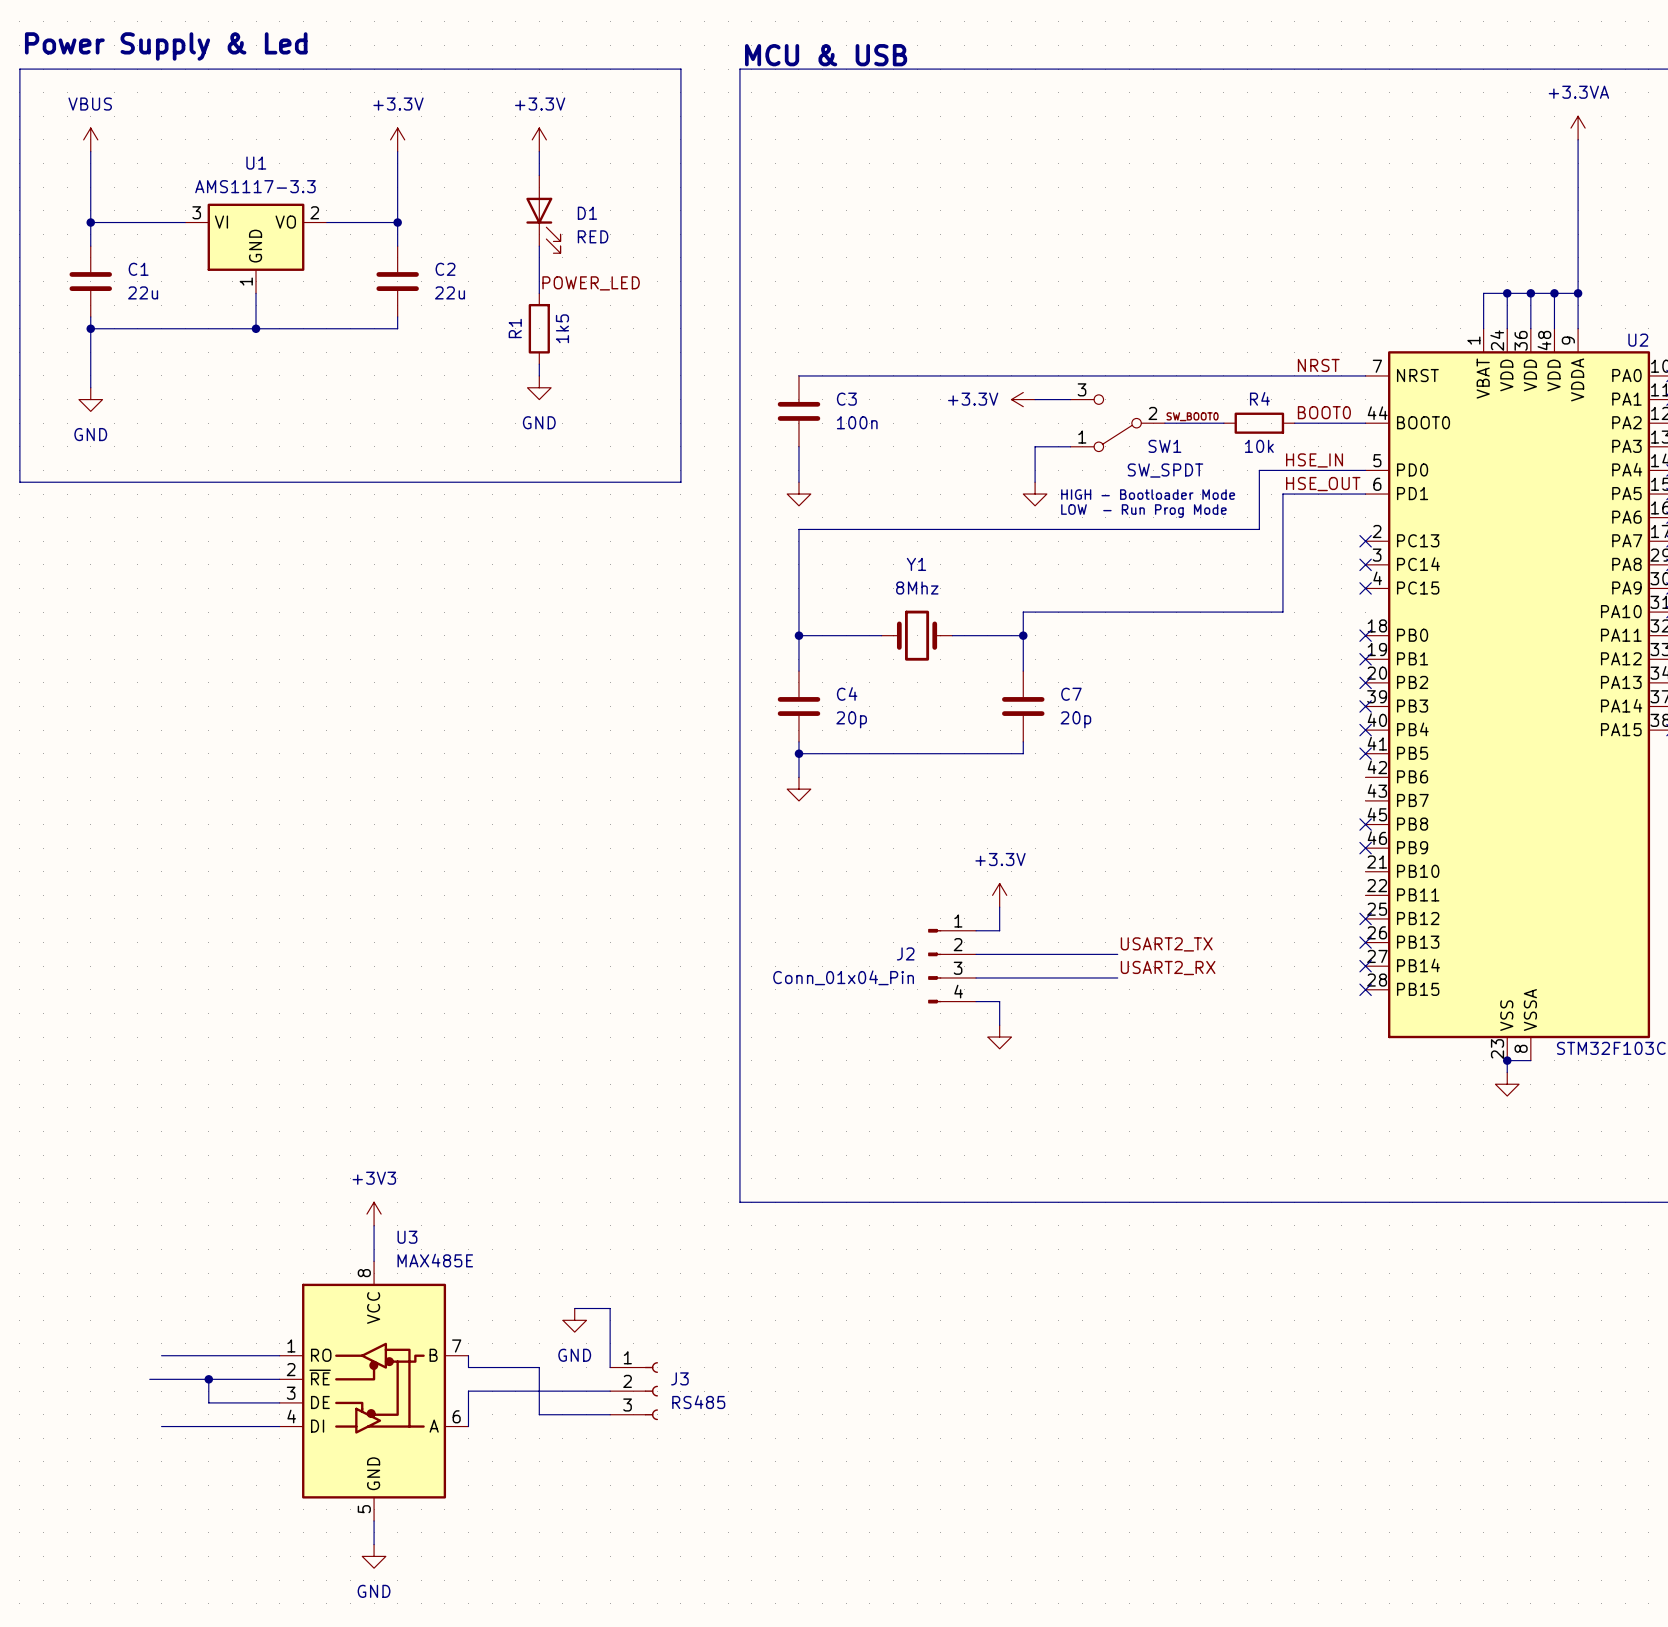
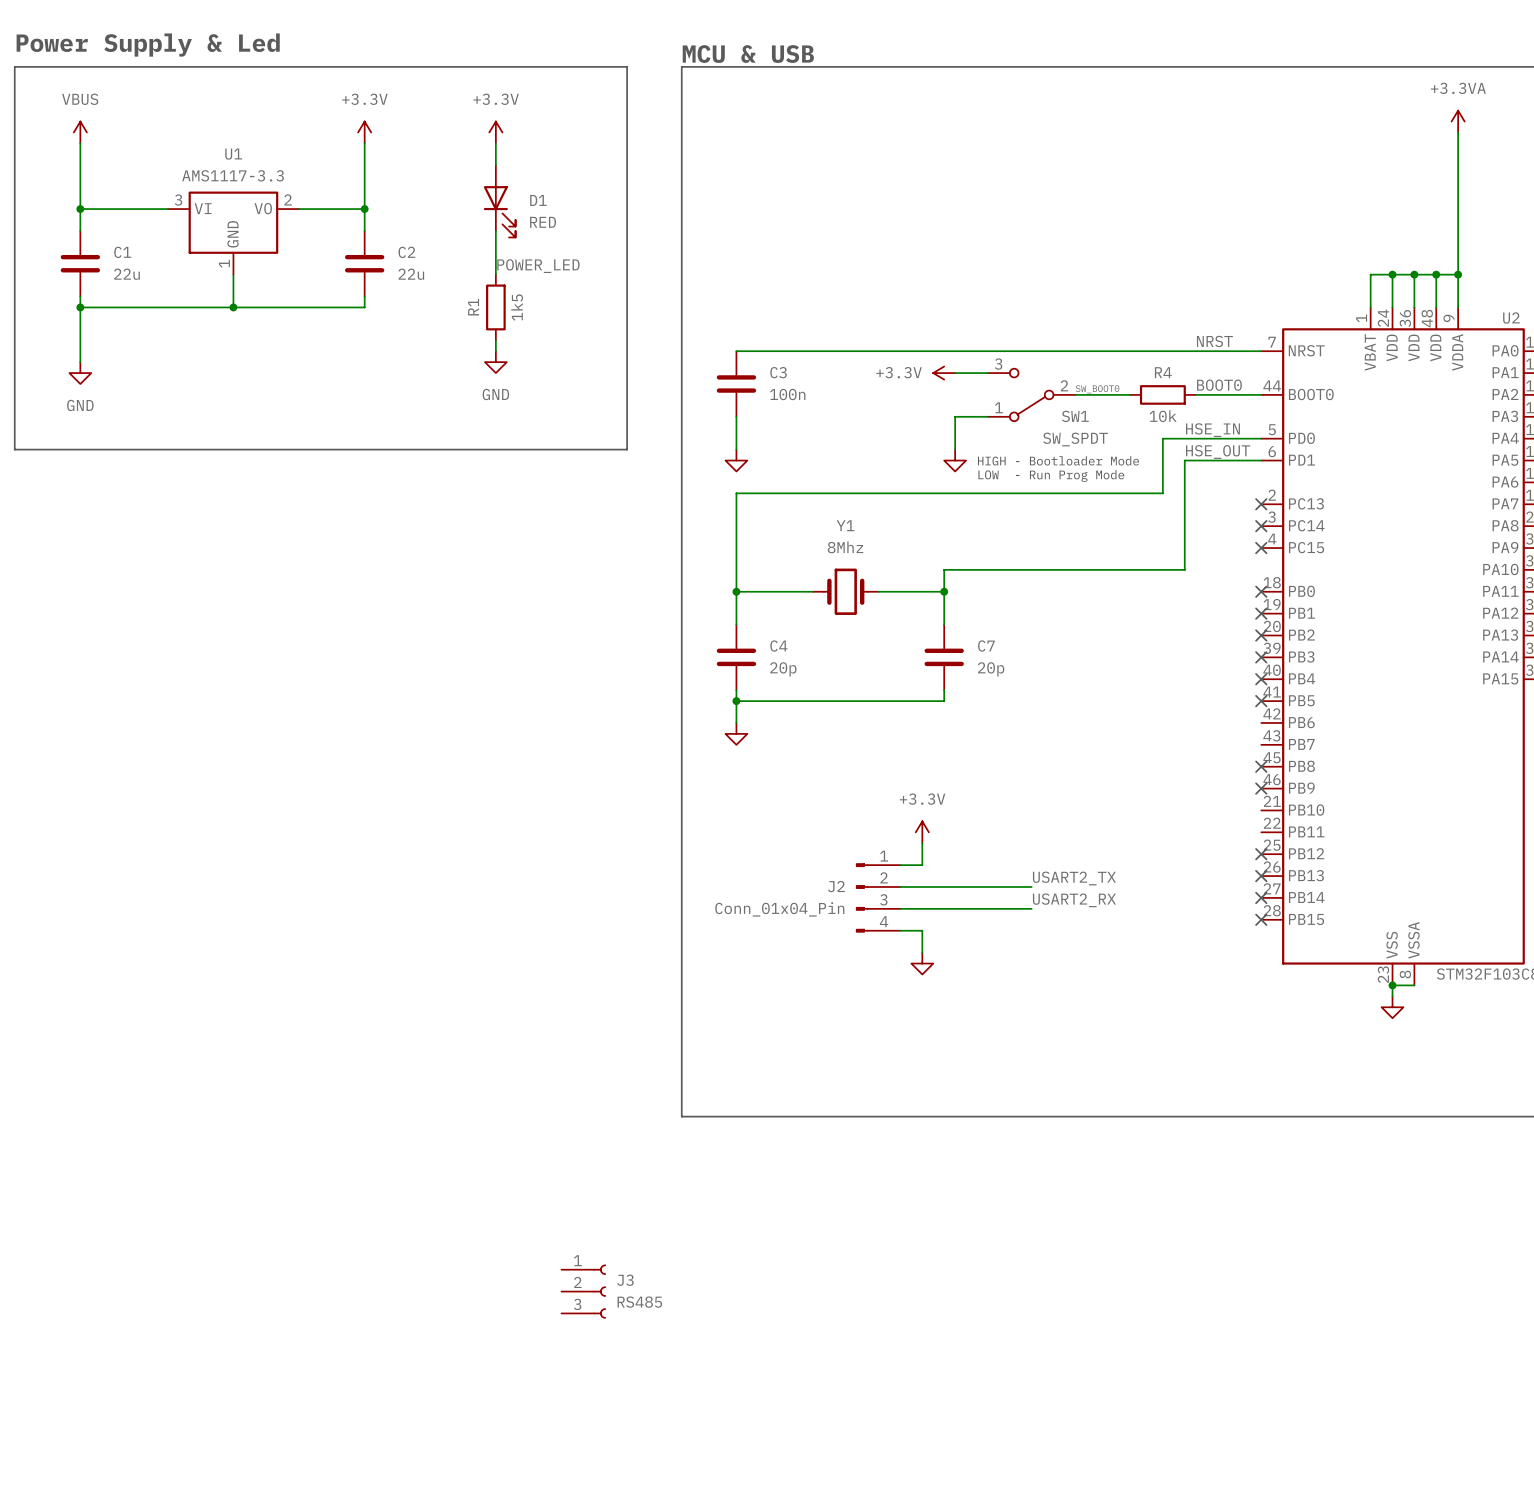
power symbol: +3V3 (374, 1214) -> none
wire: (374, 1225) (374, 1261) -> none
wire: (574, 1308) (610, 1308) (610, 1367) -> none
power symbol: GND (574, 1320) -> none
wire: (161, 1355) (279, 1355) -> none
wire: (468, 1355) (468, 1367) (539, 1367) (539, 1414) (610, 1414) -> none
wire: (149, 1379) (279, 1379) -> none
wire: (208, 1379) (208, 1402) (279, 1402) -> none
junction: (208, 1379) -> none
U3: MAX485E (374, 1391) -> none
wire: (610, 1391) (468, 1391) (468, 1426) -> none
wire: (161, 1426) (279, 1426) -> none
wire: (374, 1520) (374, 1544) -> none
power symbol: GND (374, 1556) -> none

